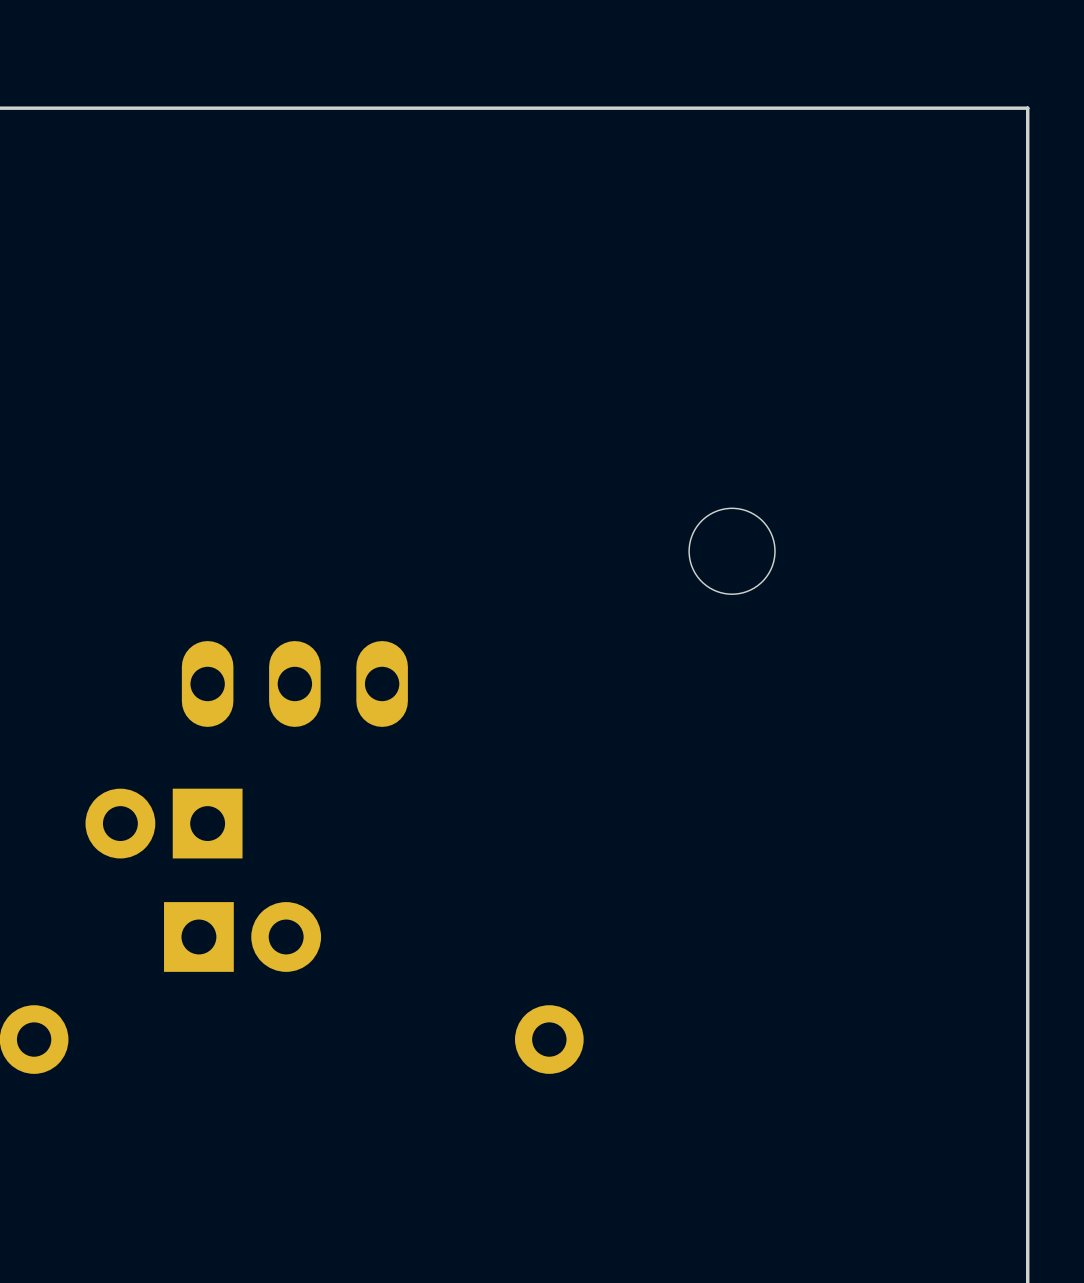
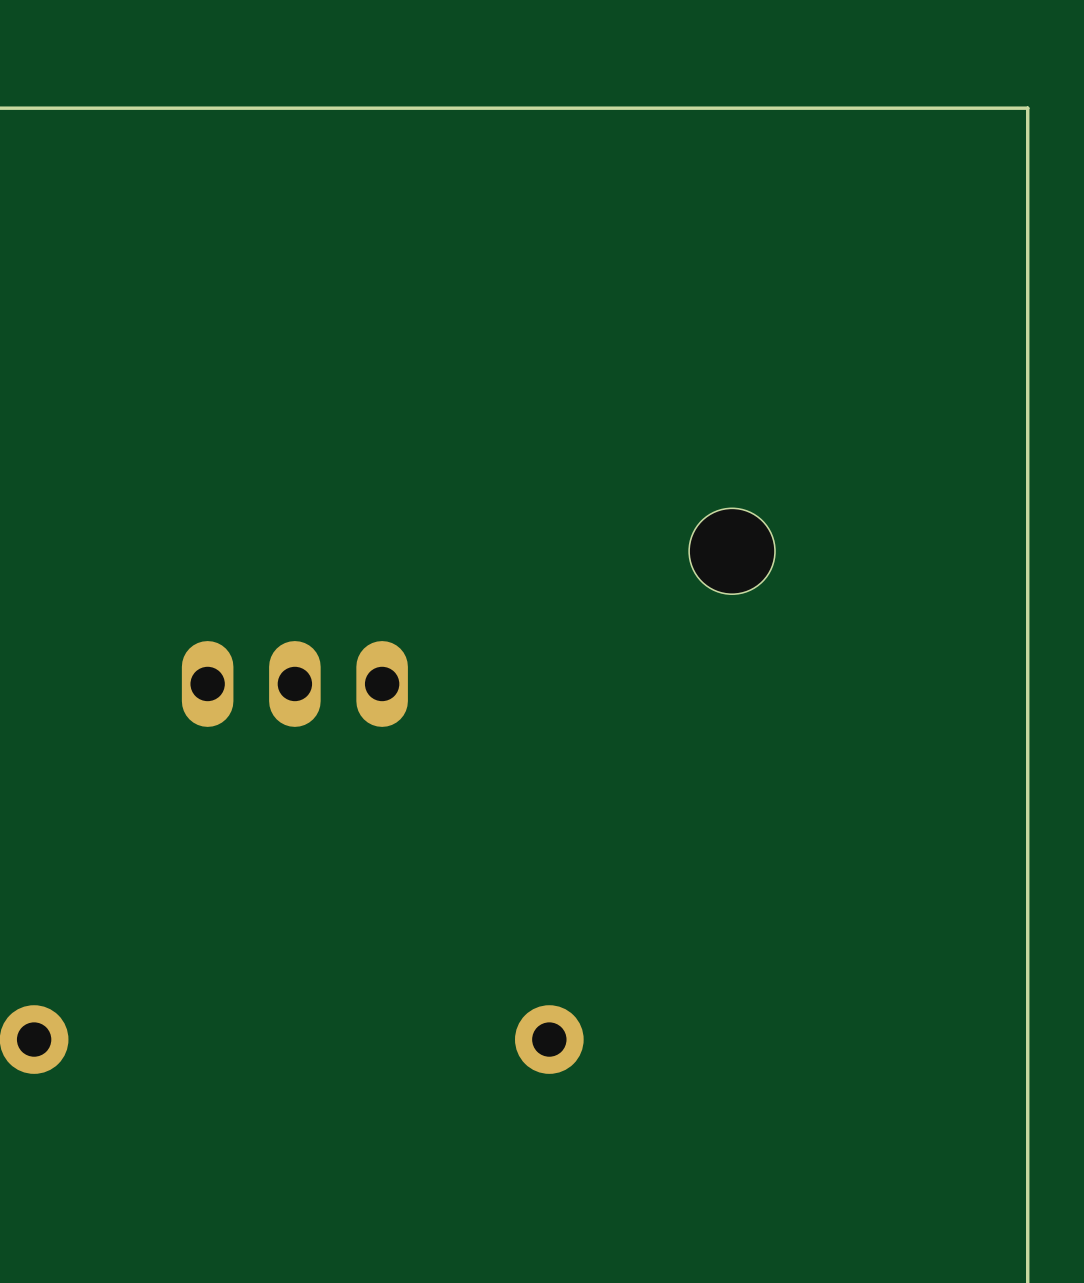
part: (164, 823) -> none
part: (242, 936) -> none

